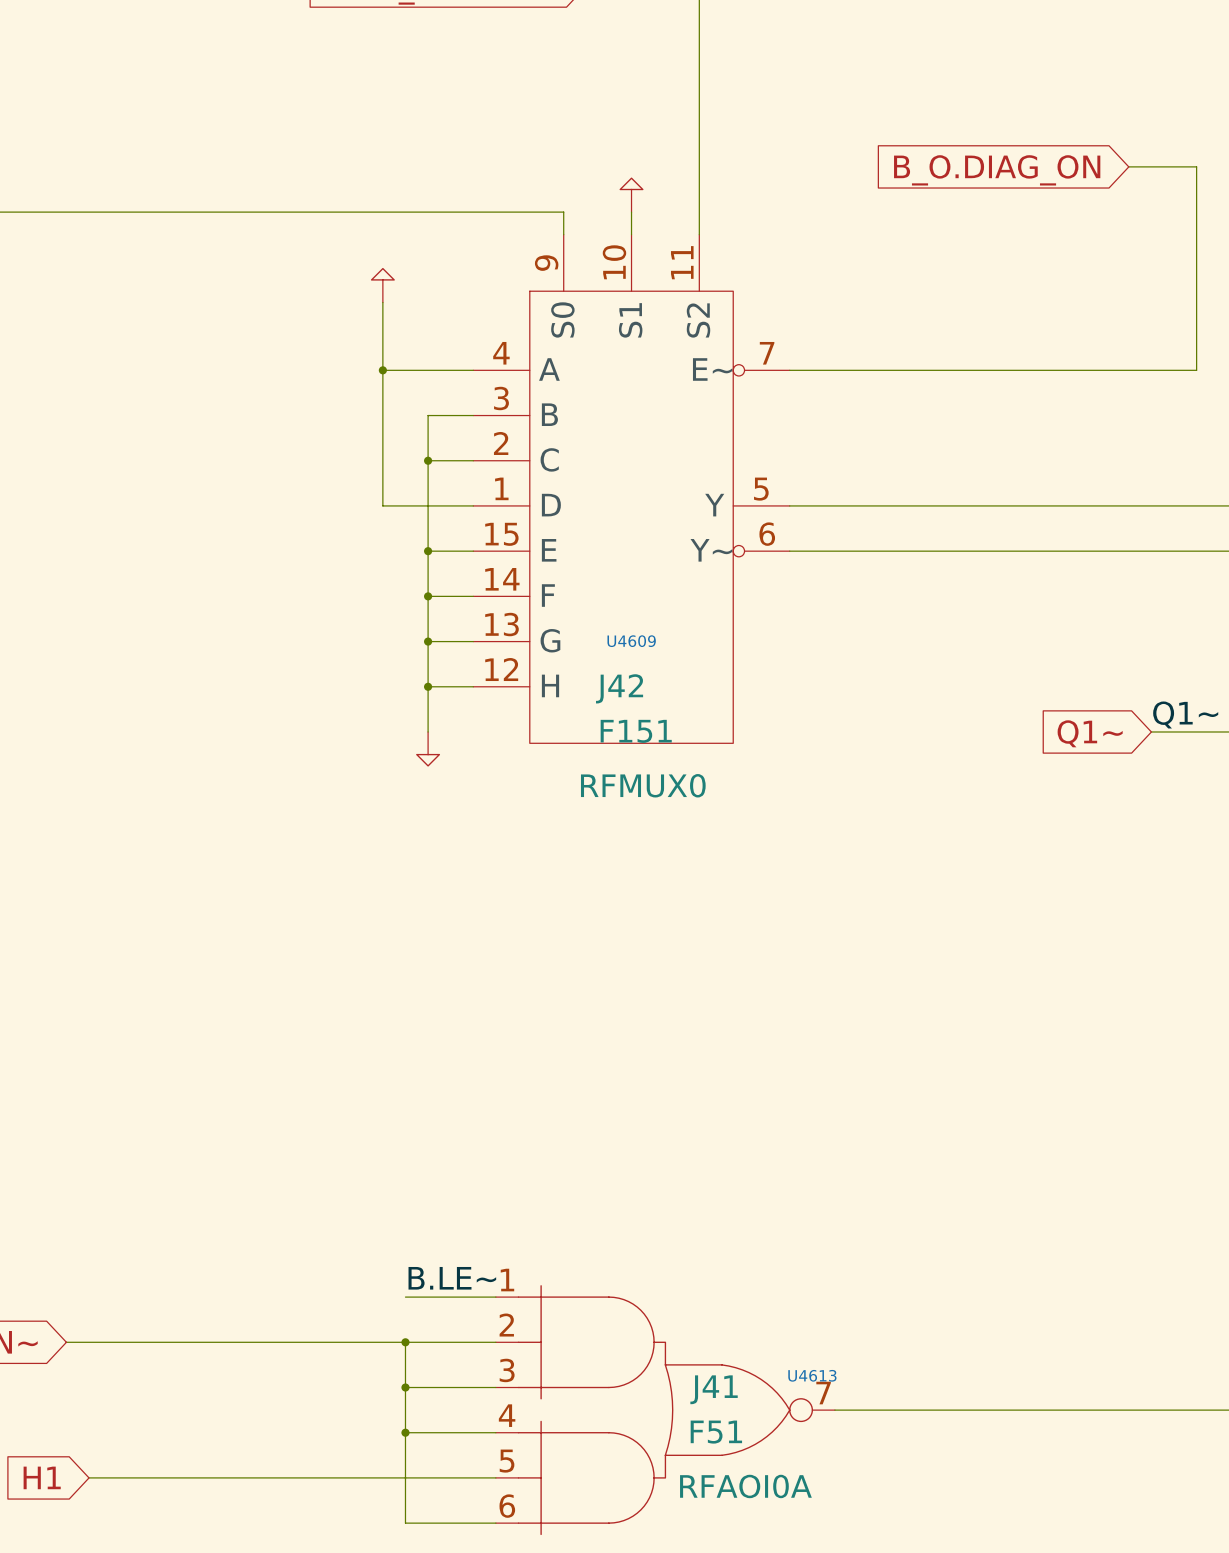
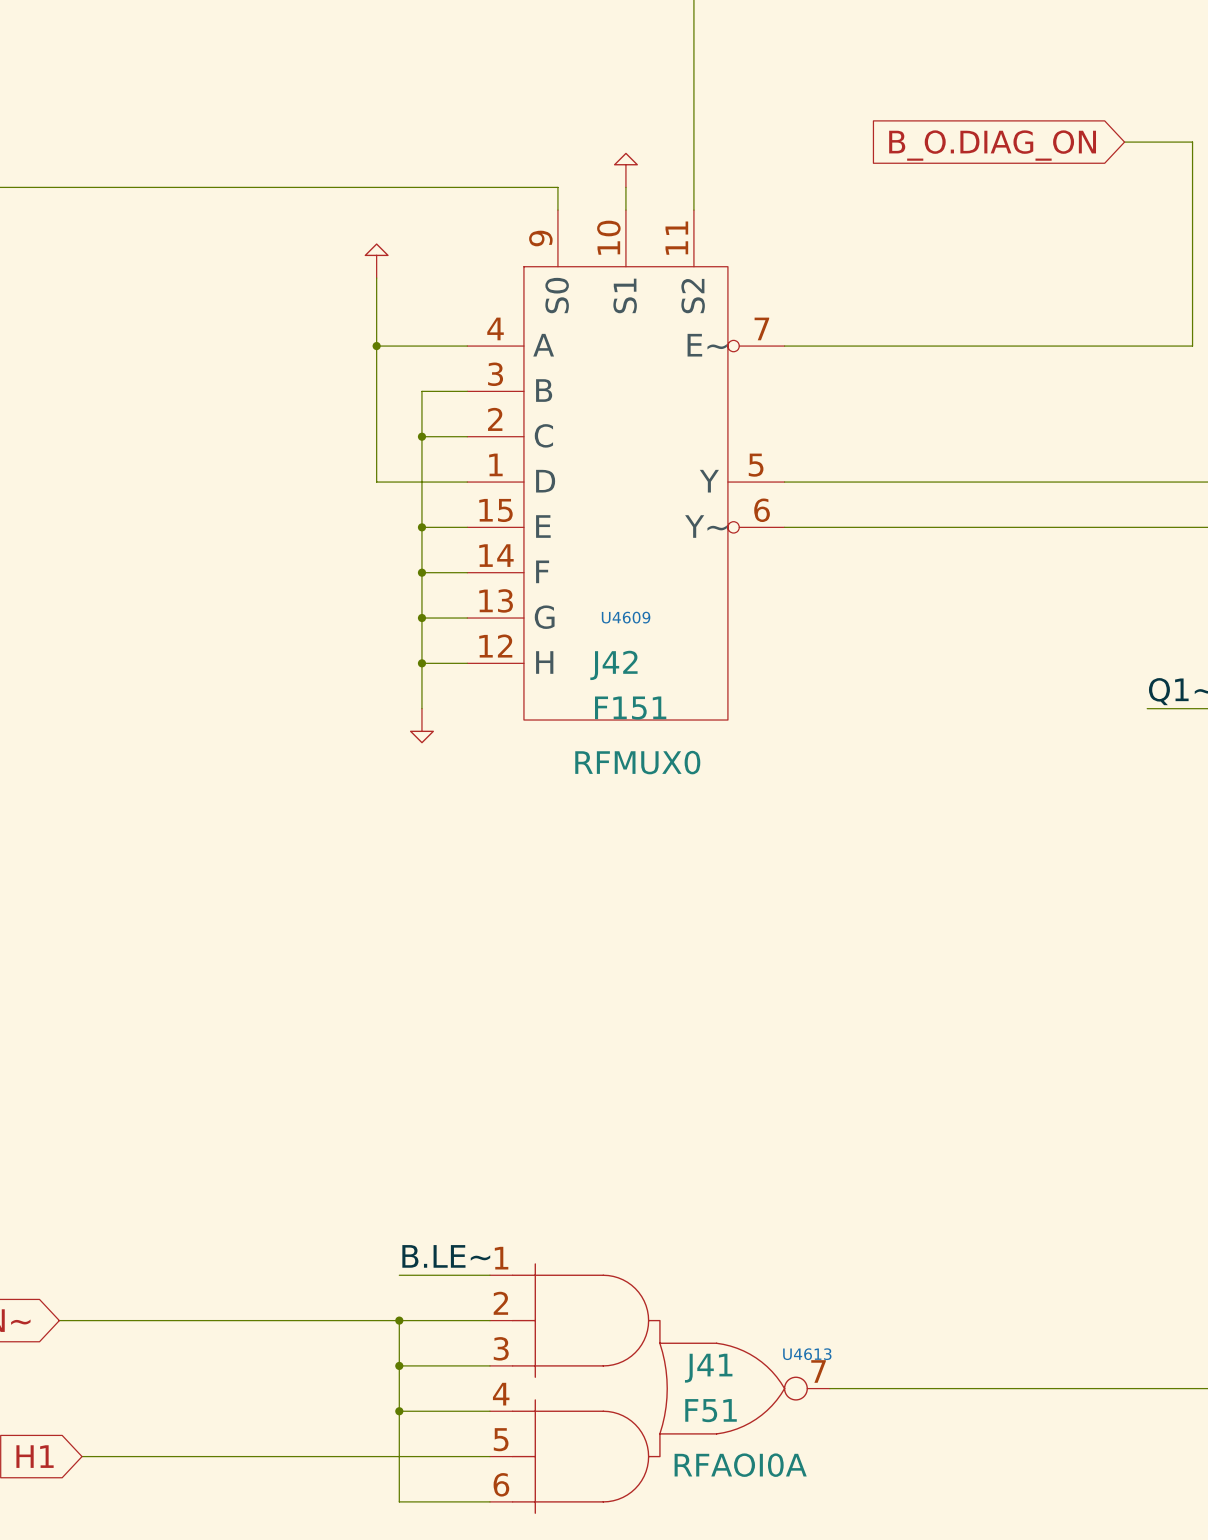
global label: Q1~ (1090, 733) -> none

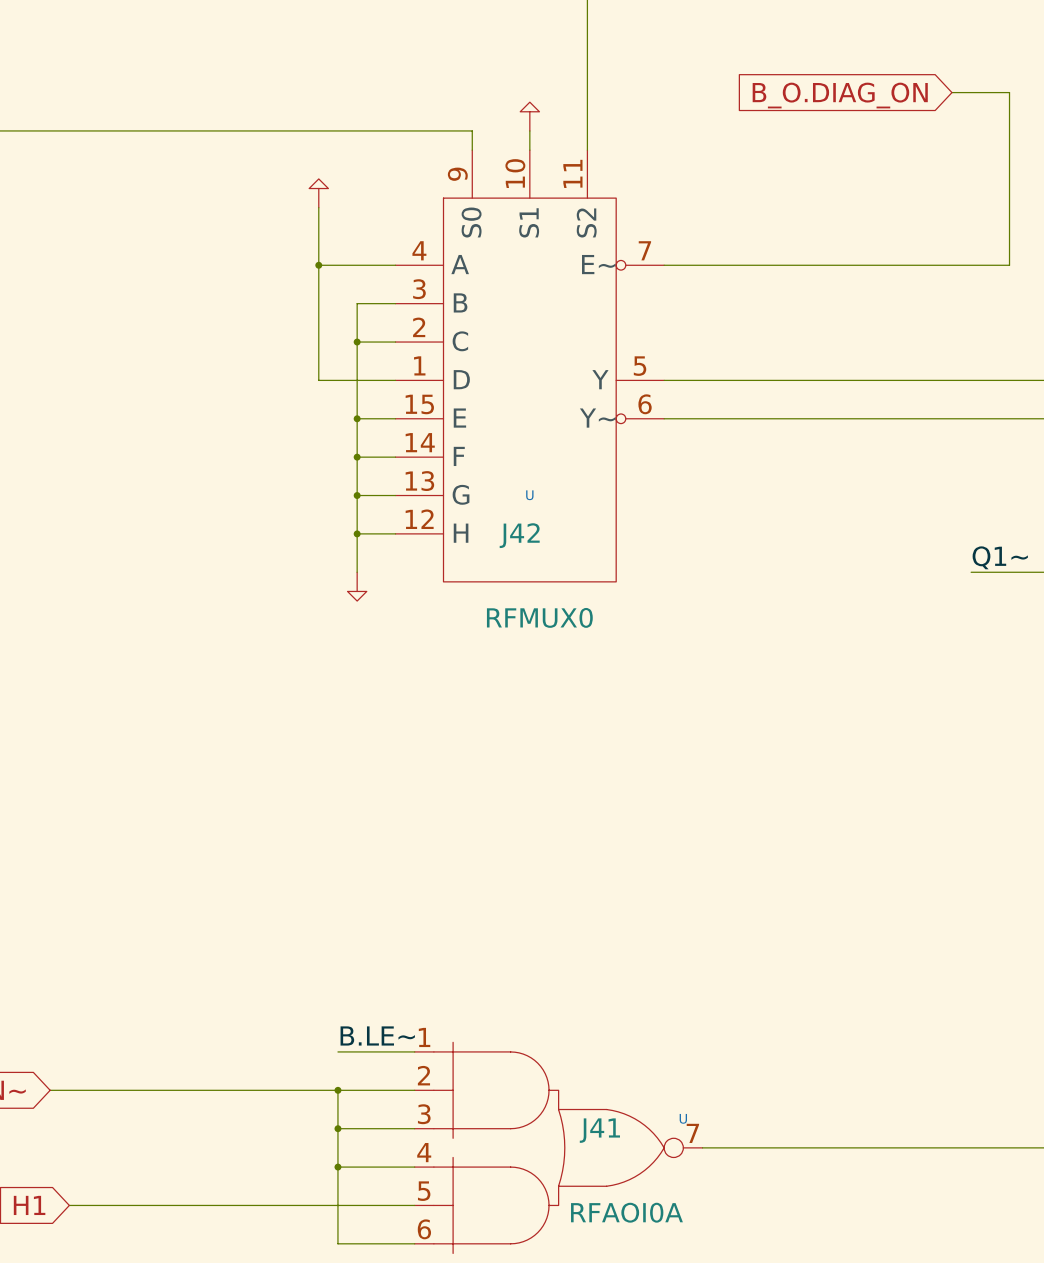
U4609 name: U4609 (626, 617) -> U (529, 495)
U4609 value: F151 (630, 708) -> none
U4613 name: U4613 (807, 1354) -> U (683, 1118)
U4613 value: F51 (711, 1410) -> none

